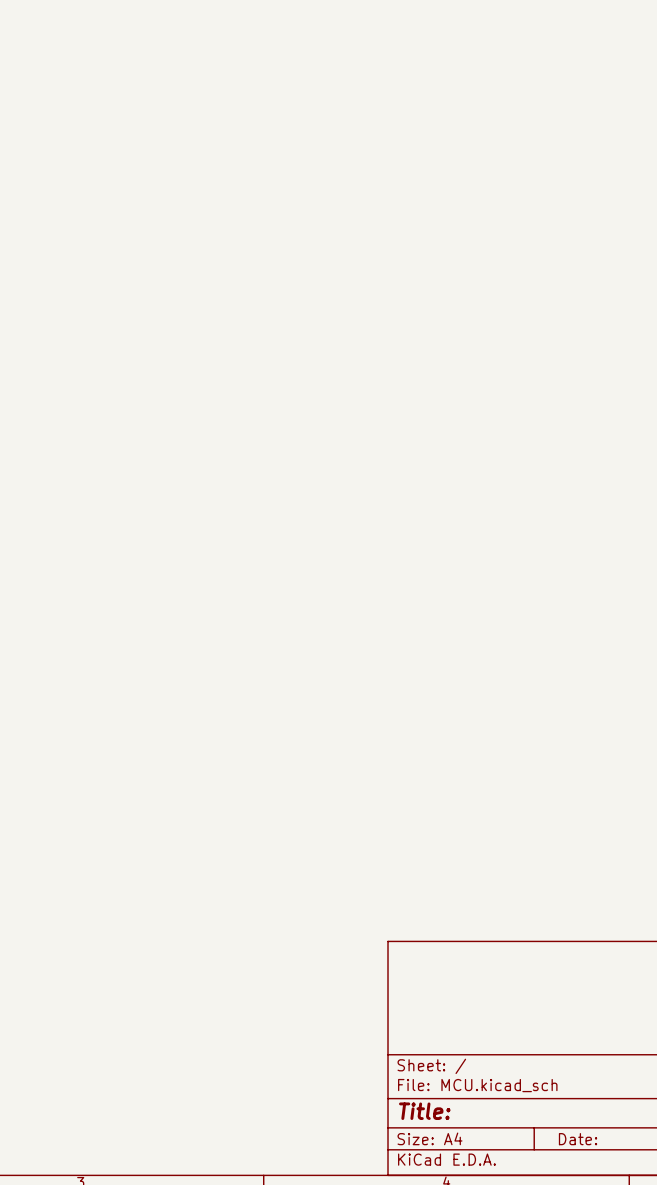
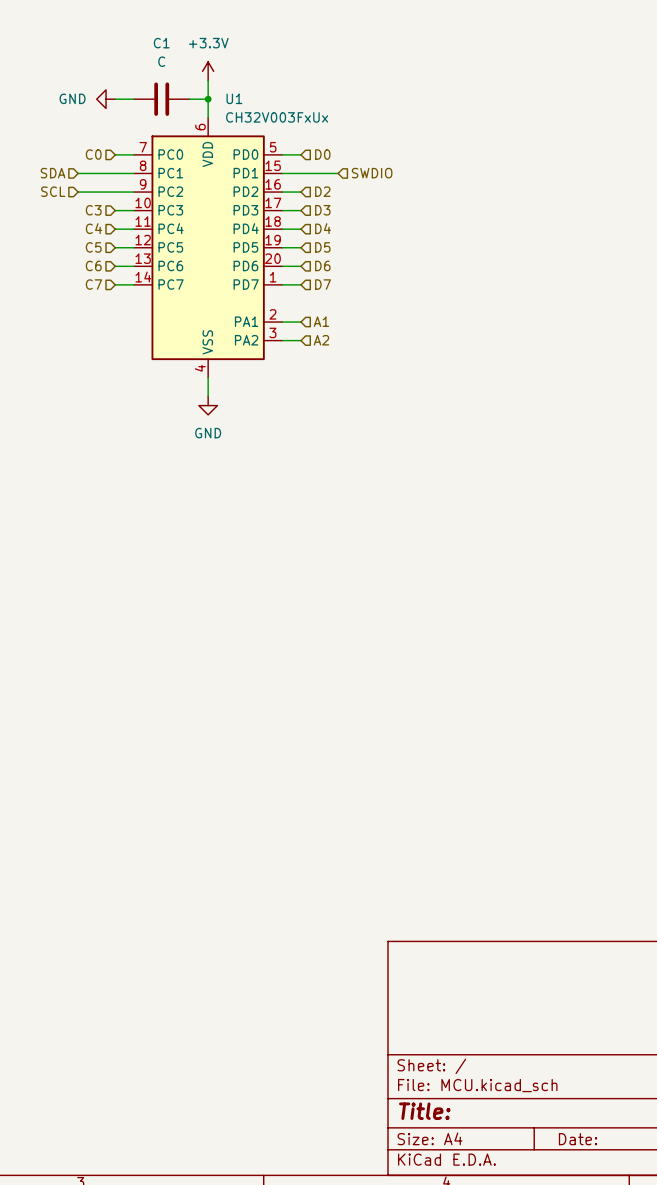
power symbol: none -> +3.3V (208, 71)
wire: none -> (208, 80) (208, 117)
power symbol: none -> GND (106, 99)
wire: none -> (115, 99) (133, 99)
C1: none -> C (161, 99)
wire: none -> (189, 99) (208, 99)
junction: none -> (208, 99)
hierarchical label: none -> C0 (93, 154)
wire: none -> (115, 154) (133, 154)
wire: none -> (282, 154) (301, 154)
hierarchical label: none -> D0 (322, 154)
hierarchical label: none -> SDA (53, 173)
wire: none -> (78, 173) (133, 173)
wire: none -> (282, 173) (338, 173)
hierarchical label: none -> SWDIO (372, 173)
hierarchical label: none -> SCL (53, 191)
hierarchical label: none -> D2 (322, 191)
wire: none -> (78, 192) (133, 192)
wire: none -> (282, 192) (301, 192)
hierarchical label: none -> C3 (93, 210)
wire: none -> (115, 210) (133, 210)
wire: none -> (282, 210) (301, 210)
hierarchical label: none -> D3 (322, 210)
hierarchical label: none -> C4 (93, 228)
hierarchical label: none -> D4 (323, 228)
wire: none -> (115, 229) (133, 229)
wire: none -> (282, 229) (301, 229)
hierarchical label: none -> C5 (93, 247)
wire: none -> (115, 247) (133, 247)
U1: none -> CH32V003FxUx (208, 247)
wire: none -> (282, 247) (301, 247)
hierarchical label: none -> D5 (322, 247)
hierarchical label: none -> C6 (93, 265)
hierarchical label: none -> D6 (322, 265)
wire: none -> (115, 266) (133, 266)
wire: none -> (282, 266) (301, 266)
hierarchical label: none -> C7 (93, 284)
wire: none -> (115, 284) (133, 284)
wire: none -> (282, 284) (301, 284)
hierarchical label: none -> D7 (323, 284)
hierarchical label: none -> A1 (321, 321)
wire: none -> (282, 322) (301, 322)
wire: none -> (282, 340) (301, 340)
hierarchical label: none -> A2 (321, 340)
wire: none -> (208, 377) (208, 396)
power symbol: none -> GND (208, 405)

